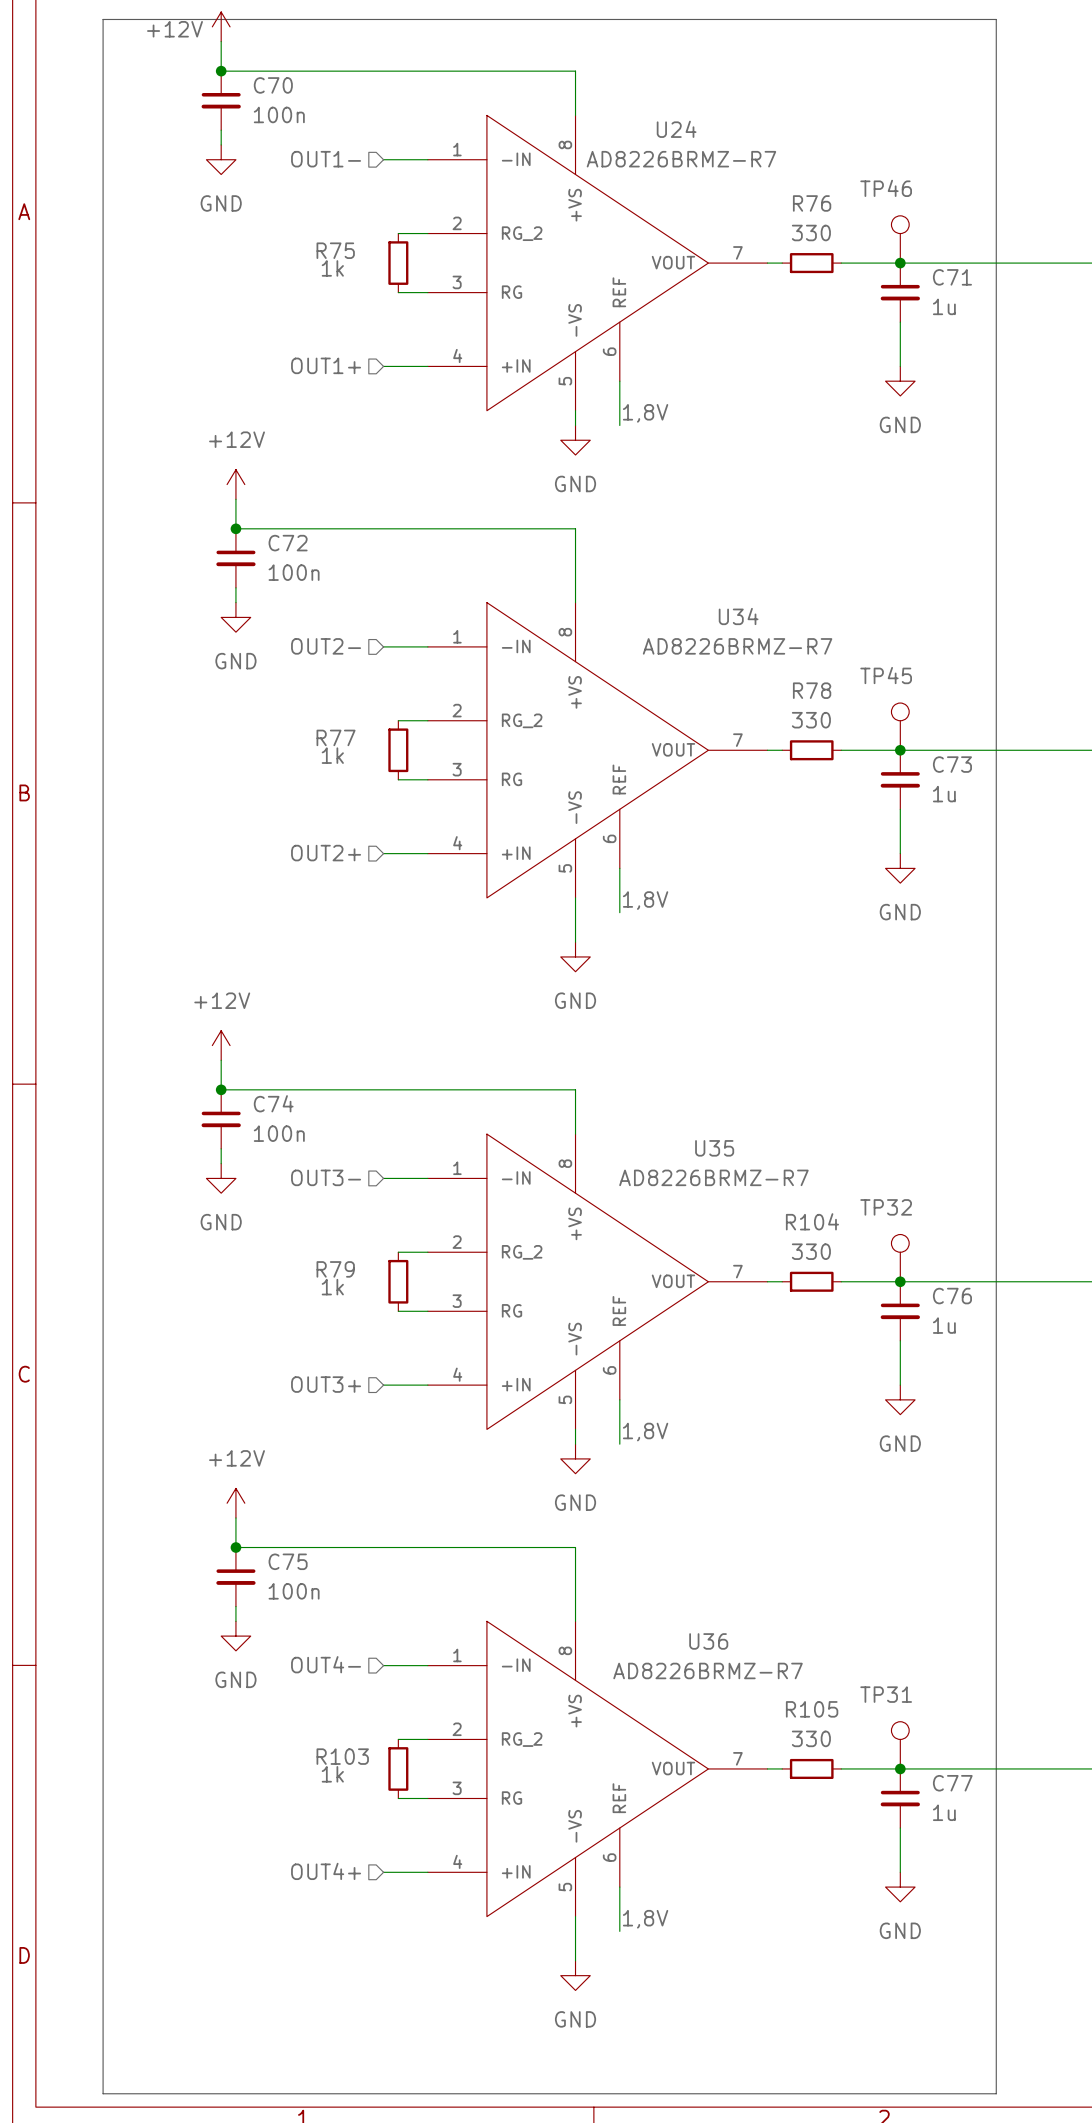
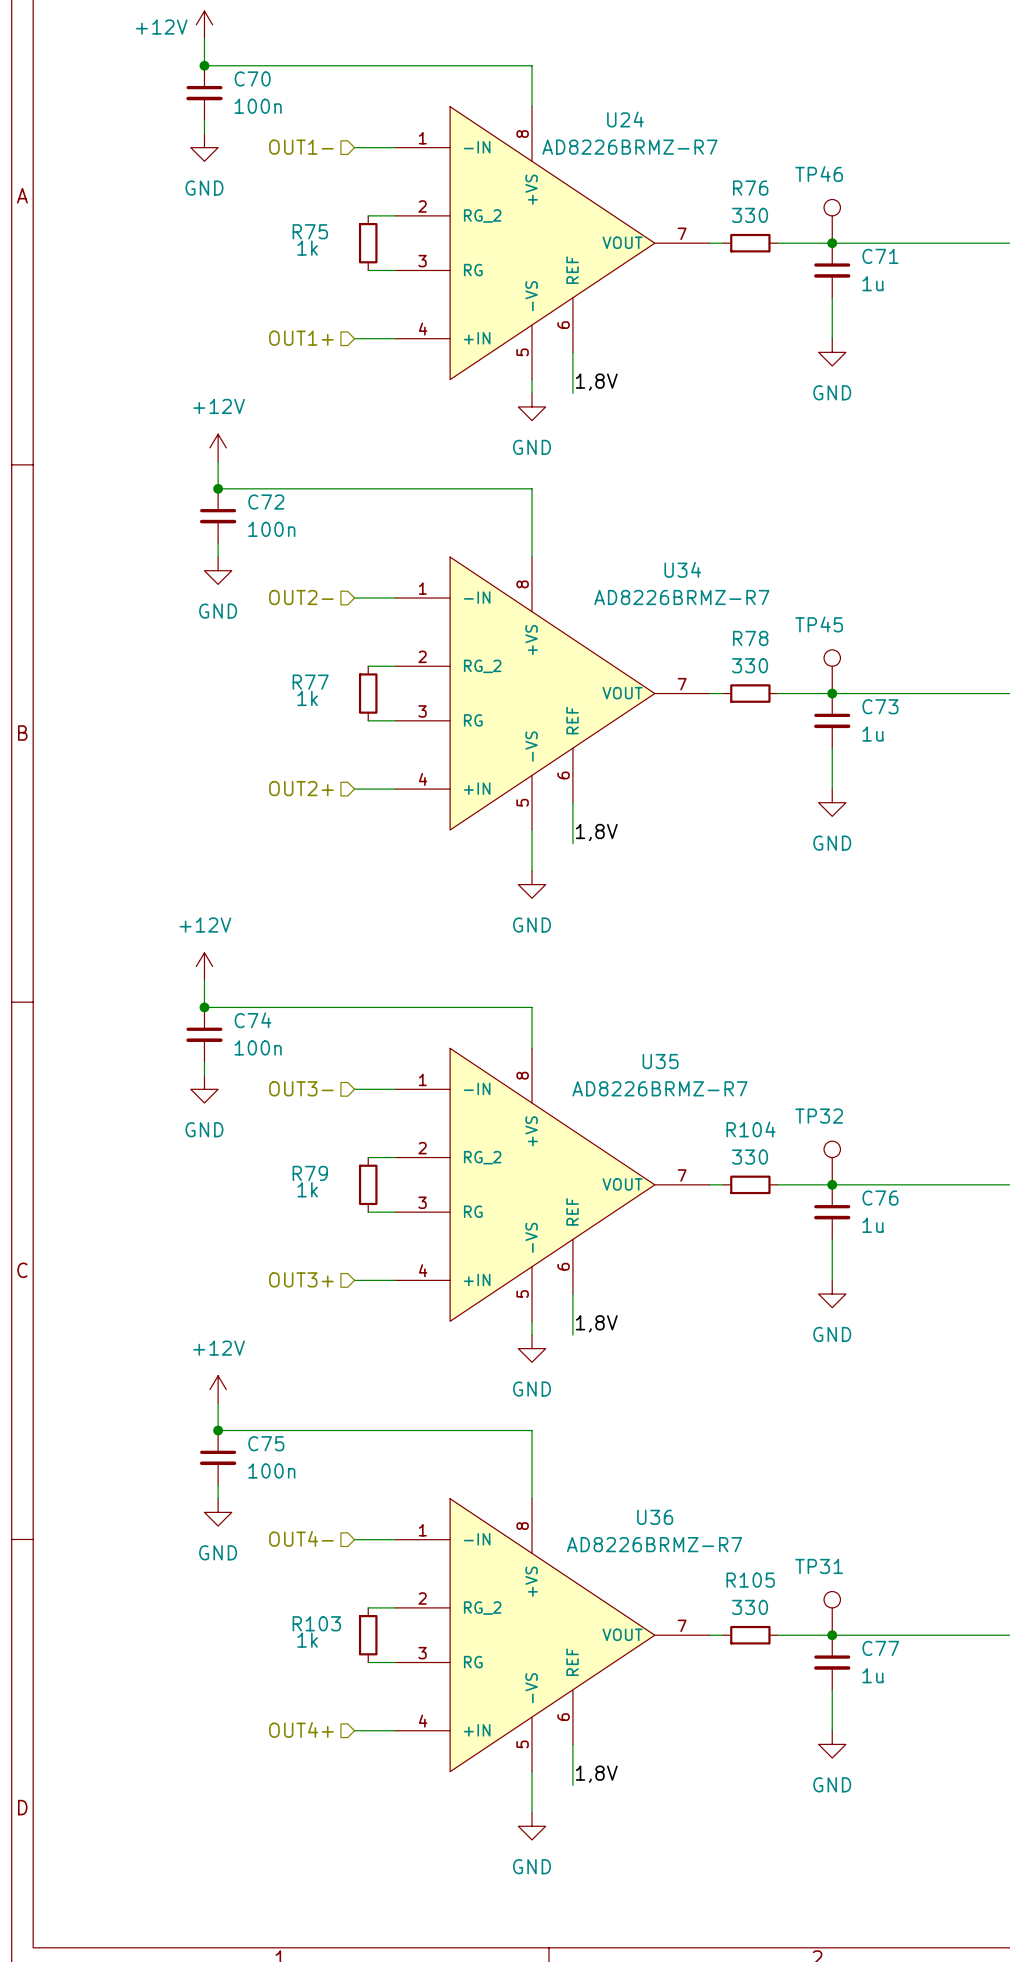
line: (103, 19) (996, 19) (996, 2093) (103, 2093) (103, 19) -> none

